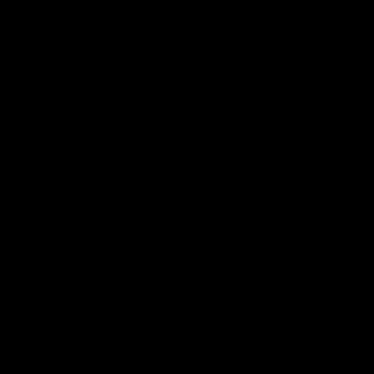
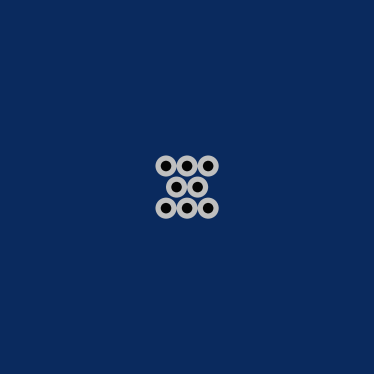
via: none -> (166, 166)
via: none -> (187, 166)
via: none -> (208, 166)
via: none -> (176, 187)
via: none -> (197, 187)
via: none -> (166, 208)
via: none -> (187, 208)
via: none -> (208, 208)

